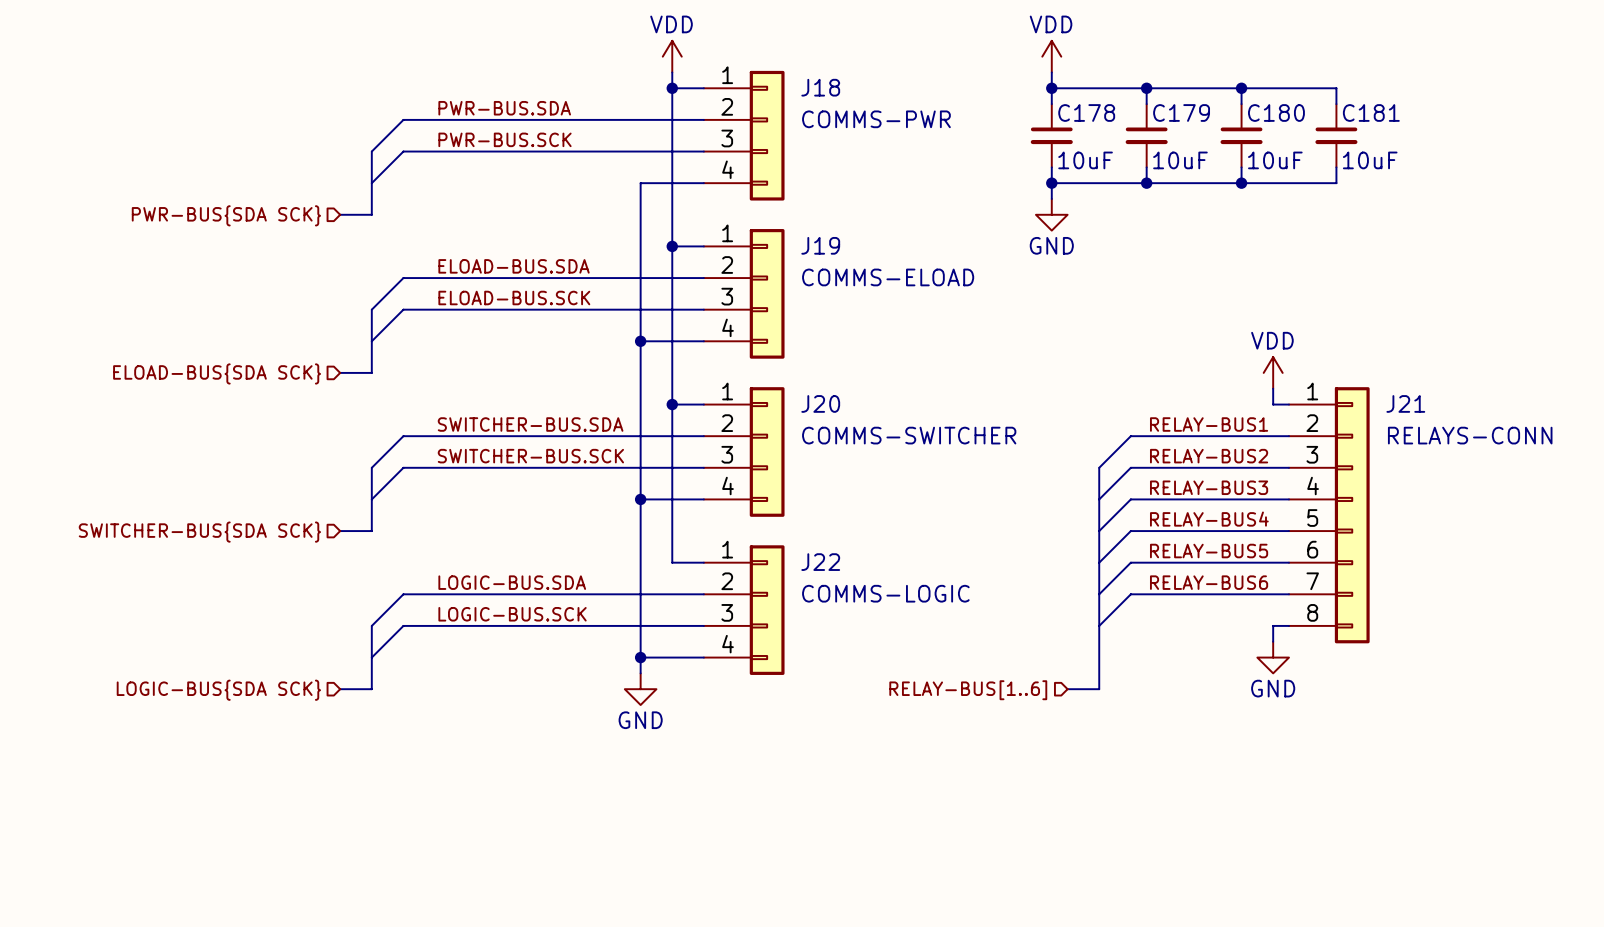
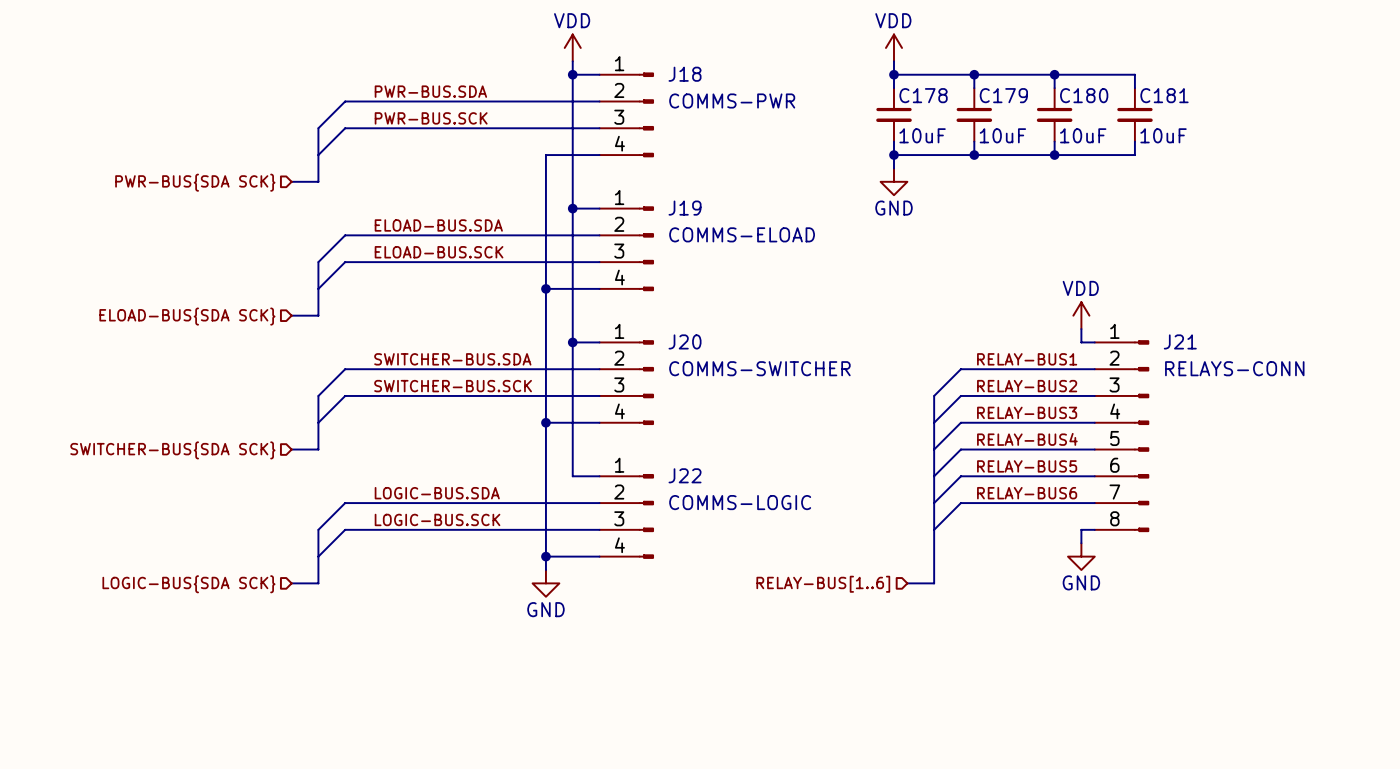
J18 symbol: [703, 70, 785, 201] -> [599, 72, 654, 158]
J19 symbol: [703, 229, 785, 359] -> [599, 206, 654, 292]
J20 symbol: [703, 387, 785, 517] -> [599, 340, 654, 425]
J21 symbol: [1288, 387, 1370, 644] -> [1094, 340, 1150, 532]
J22 symbol: [703, 545, 785, 675] -> [599, 474, 654, 559]

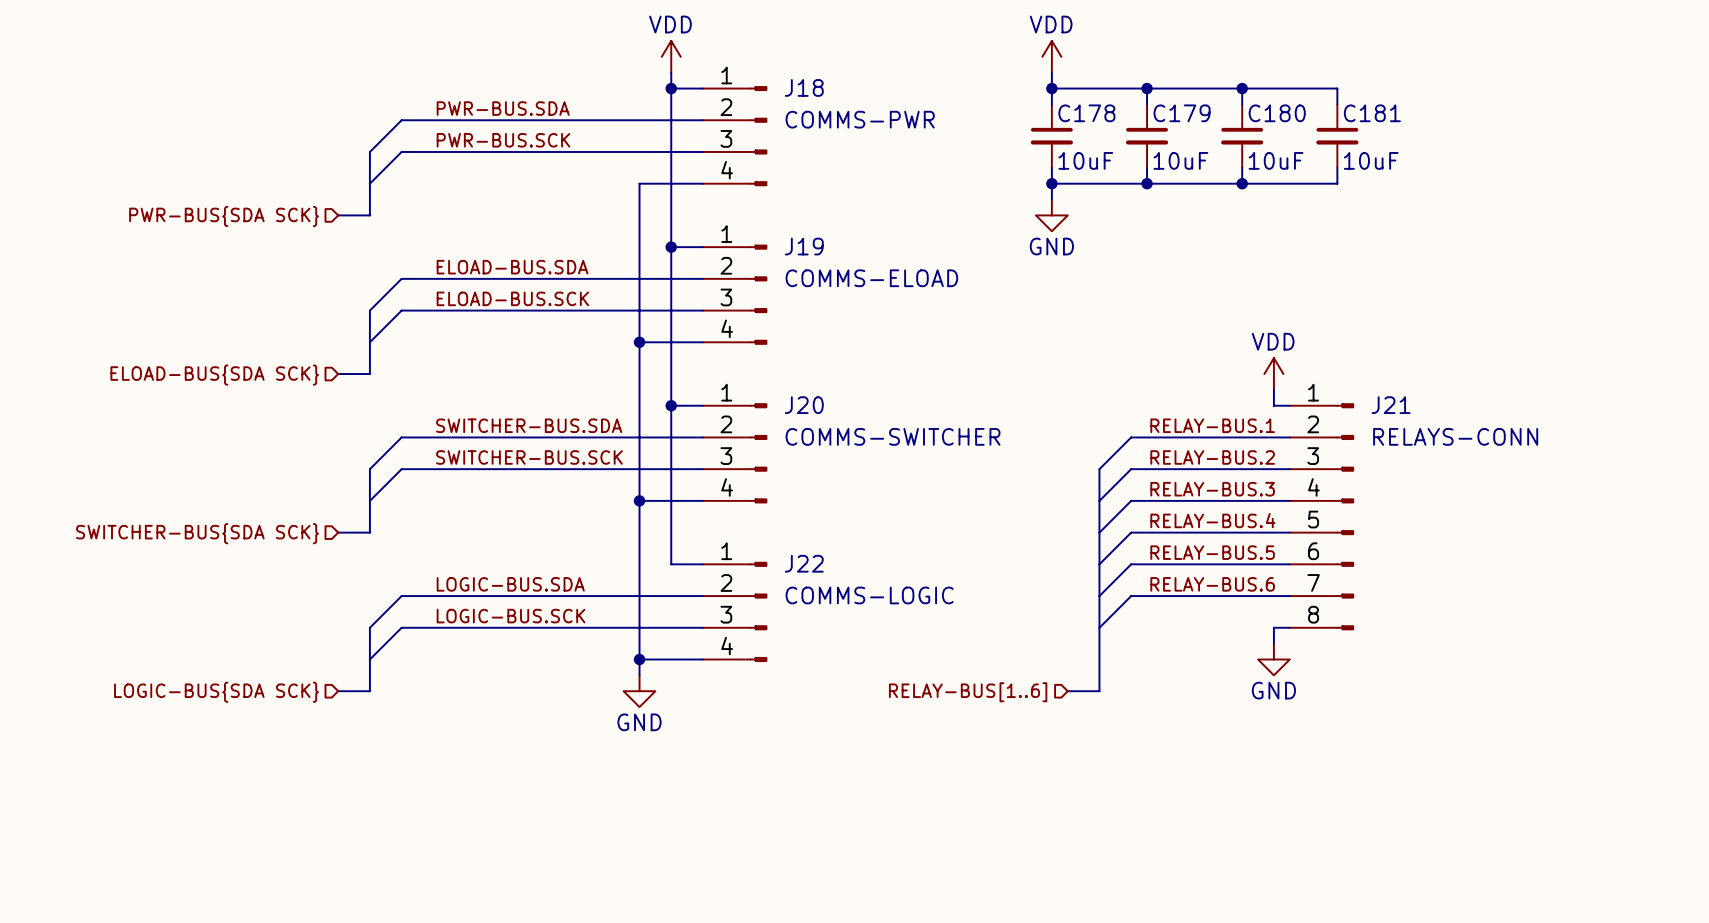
label: RELAY-BUS1 (1027, 359) -> RELAY-BUS.1 (1212, 425)
label: RELAY-BUS2 (1027, 386) -> RELAY-BUS.2 (1212, 457)
label: RELAY-BUS3 (1027, 412) -> RELAY-BUS.3 (1212, 489)
label: RELAY-BUS4 (1027, 439) -> RELAY-BUS.4 (1212, 520)
label: RELAY-BUS5 (1027, 466) -> RELAY-BUS.5 (1212, 552)
label: RELAY-BUS6 (1027, 493) -> RELAY-BUS.6 (1212, 584)

